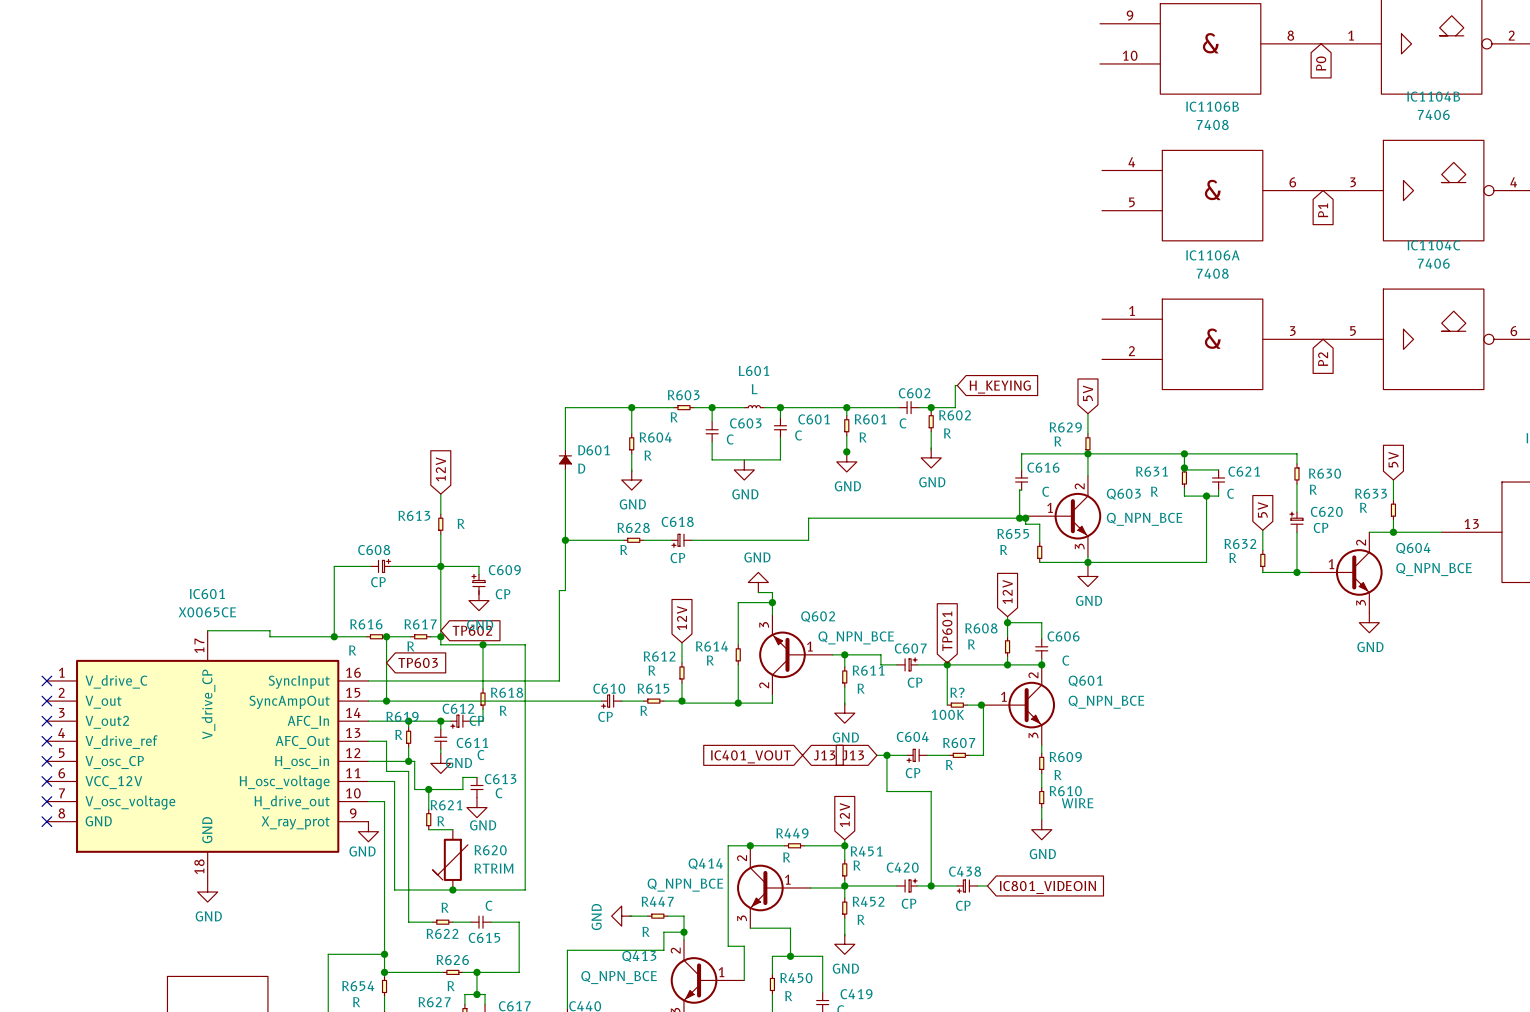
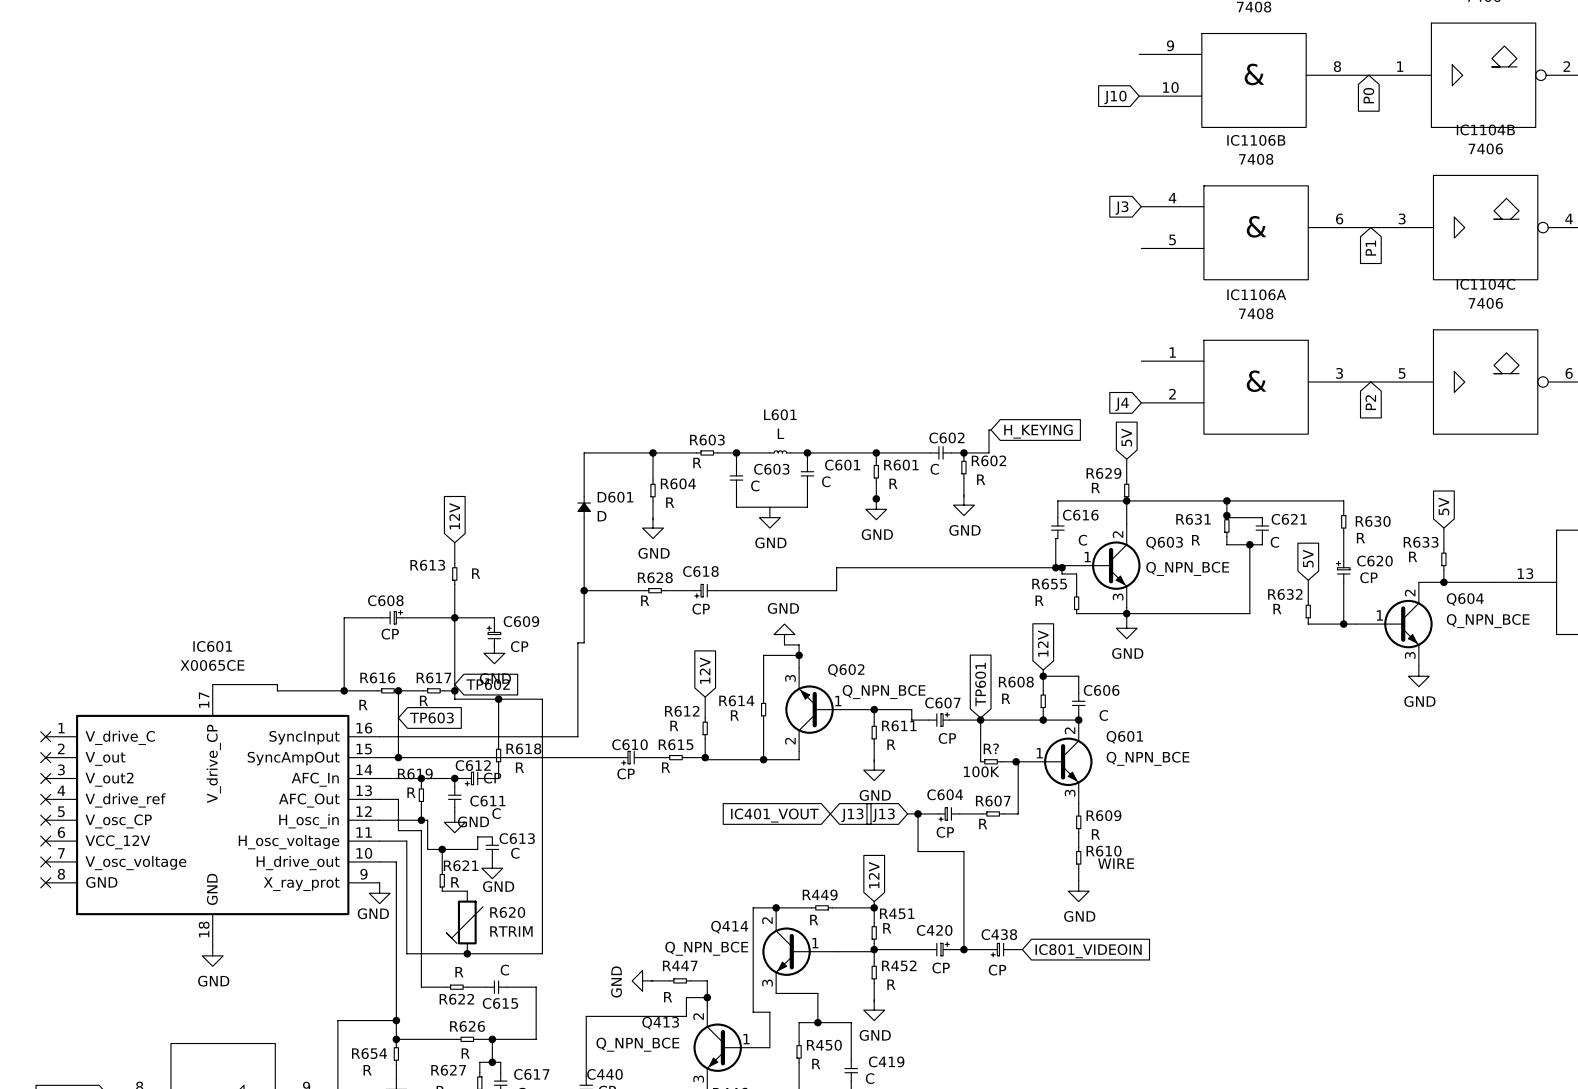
global label: none -> J10 (1115, 97)
global label: none -> J3 (1121, 208)
global label: none -> J4 (1122, 404)

